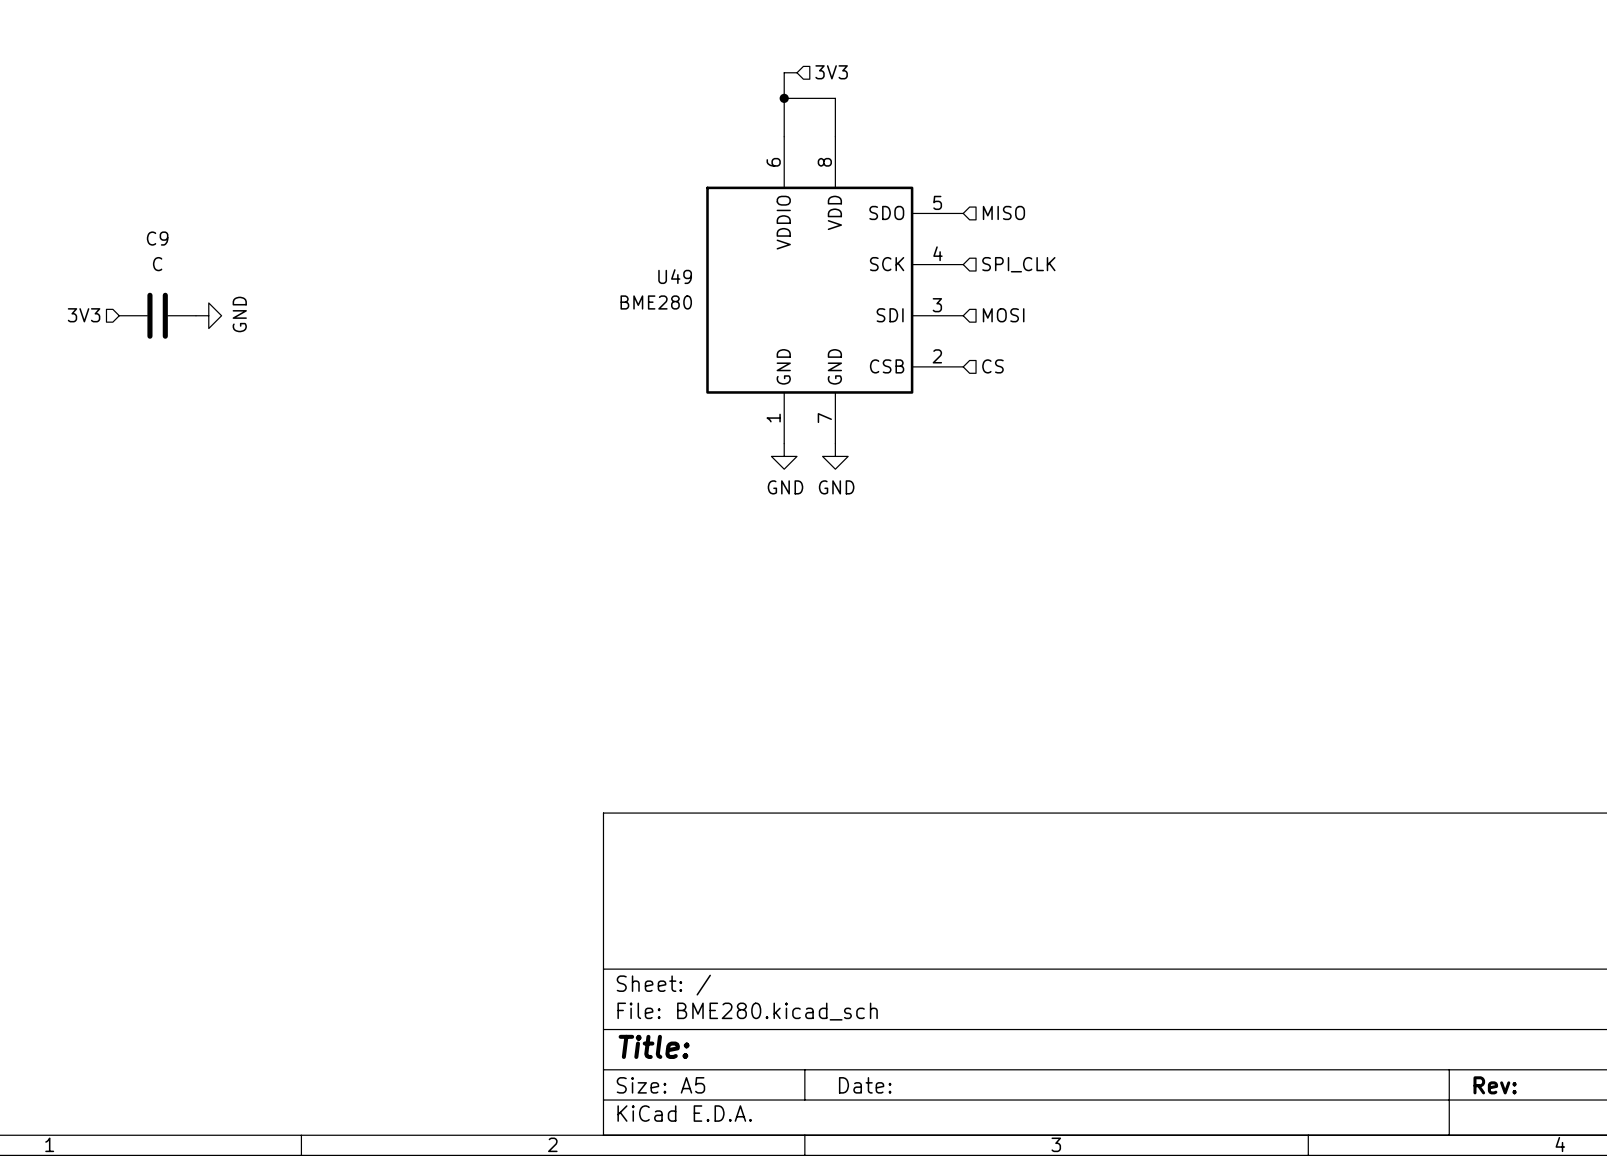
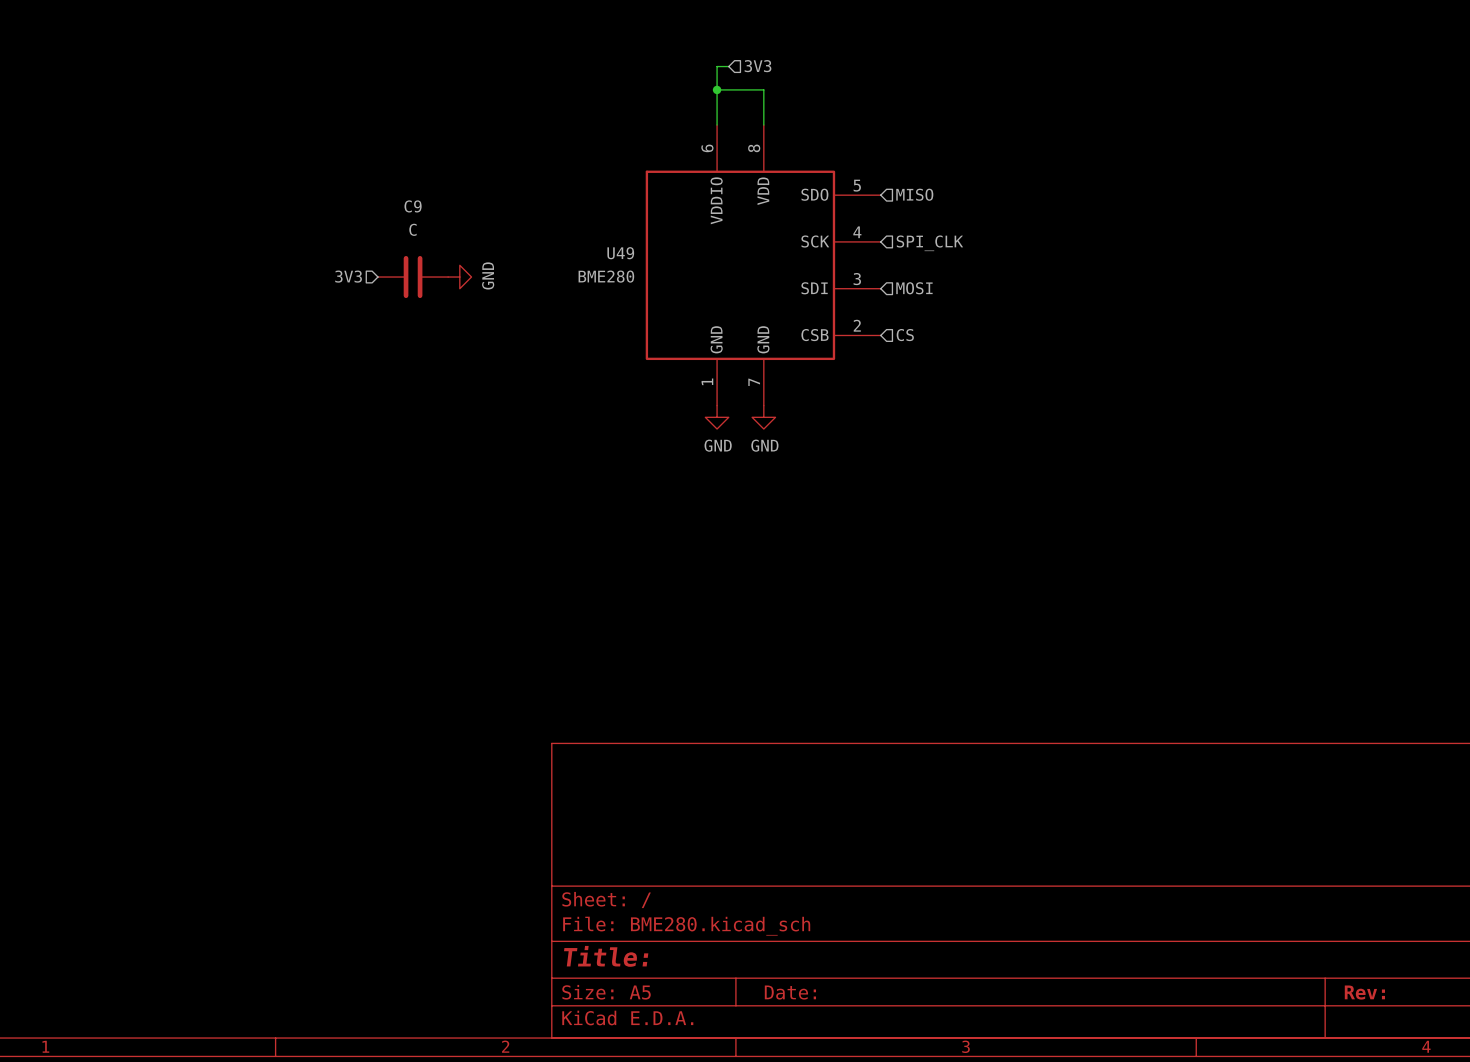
hierarchical label: none -> 3V3 (348, 276)
power symbol: none -> GND (459, 277)
hierarchical label: 3V3 (84, 315) -> none
C9 position: (157, 315) -> (413, 277)
power symbol: GND (208, 315) -> none

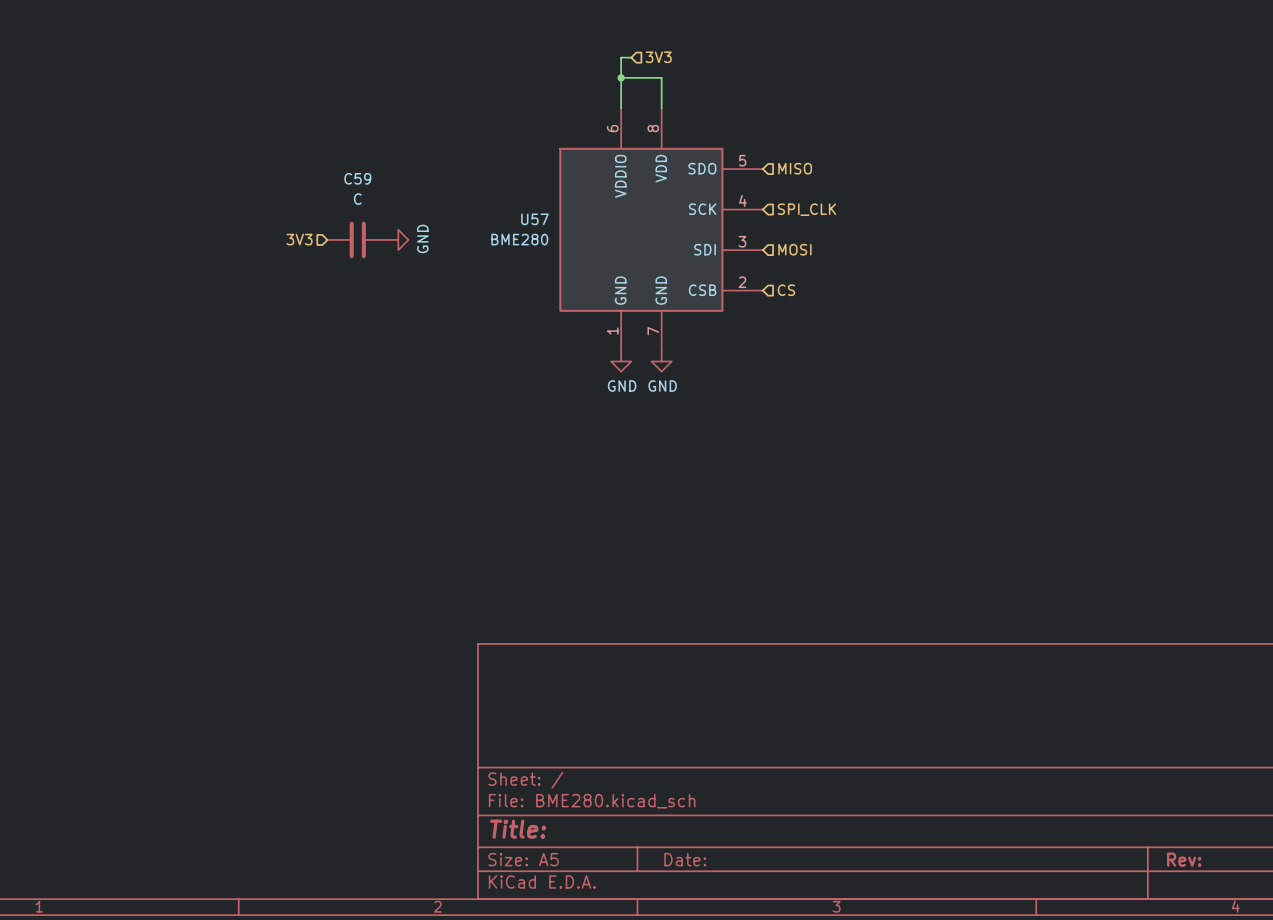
C9 name: C9 (413, 206) -> C59 (357, 178)
U49 name: U49 (620, 253) -> U57 (534, 219)

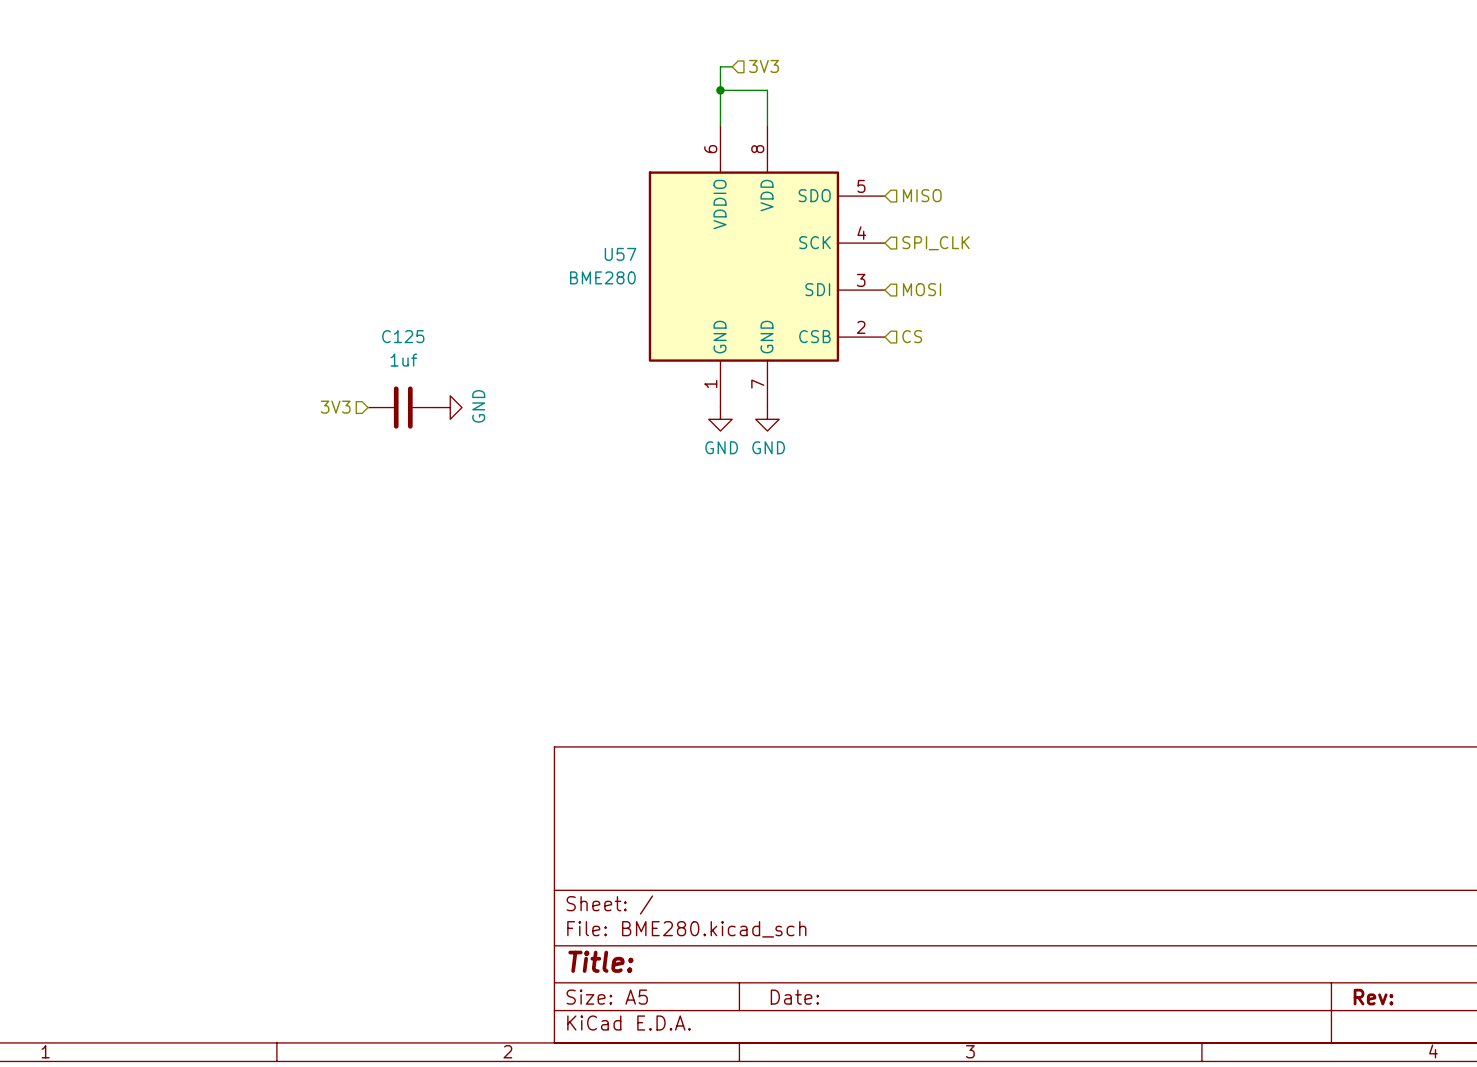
hierarchical label position: 3V3 (299, 239) -> 3V3 (335, 407)
C59: C (357, 239) -> none
power symbol position: GND (398, 239) -> GND (450, 407)
C125: none -> 1uf (403, 407)

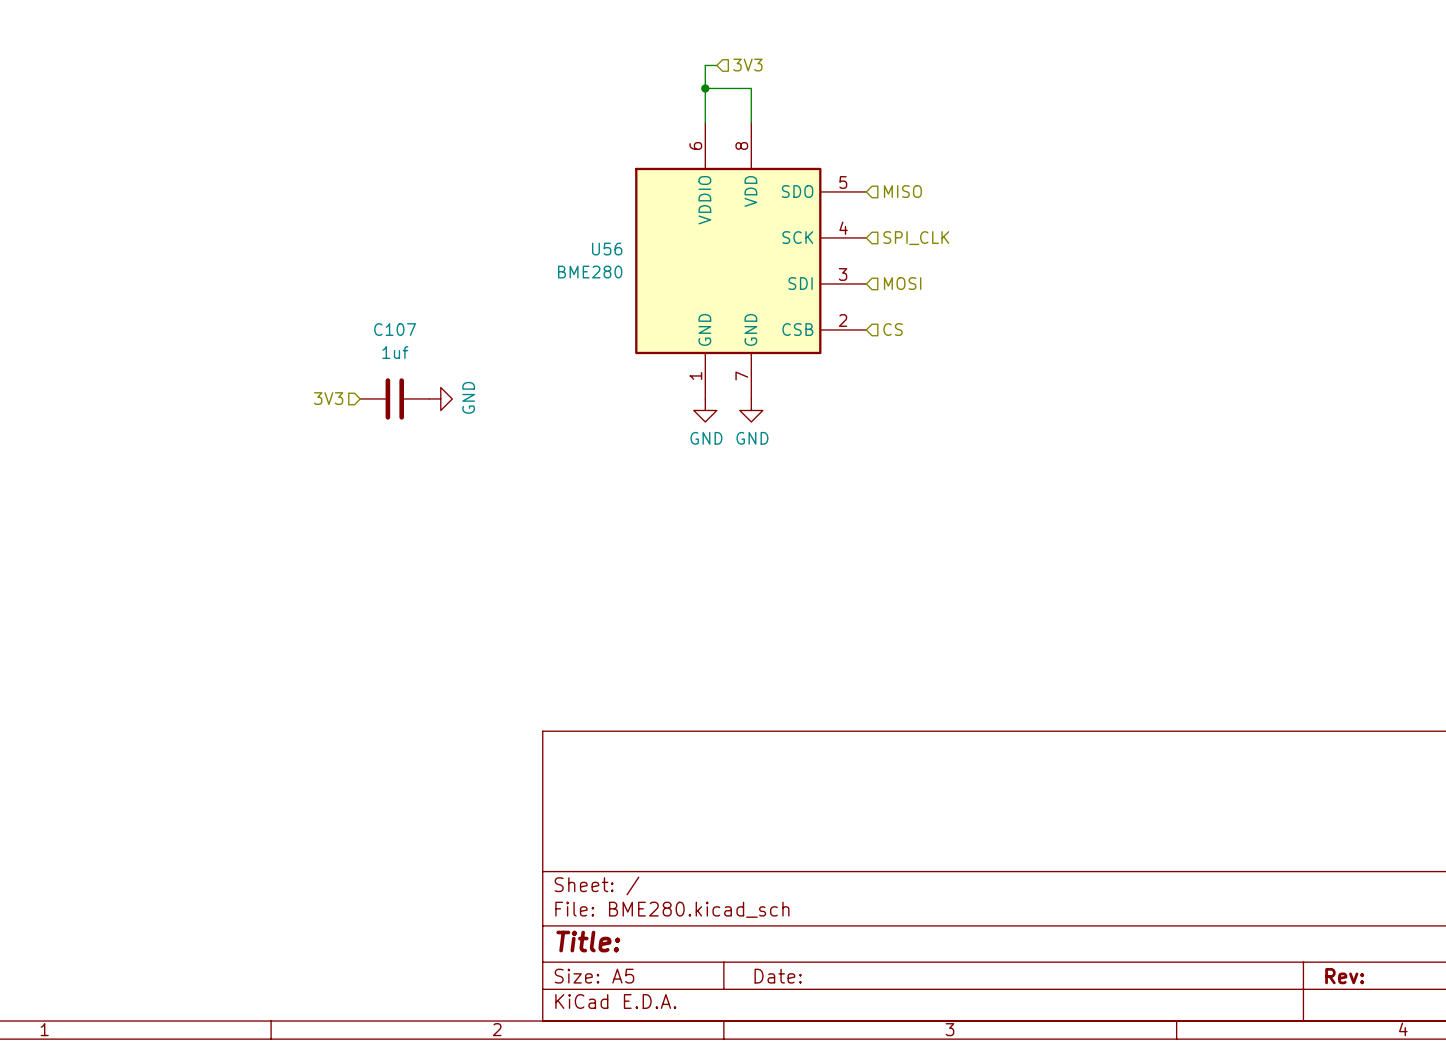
U57 name: U57 (620, 254) -> U56 (607, 249)
C125 name: C125 (403, 336) -> C107 (395, 329)

